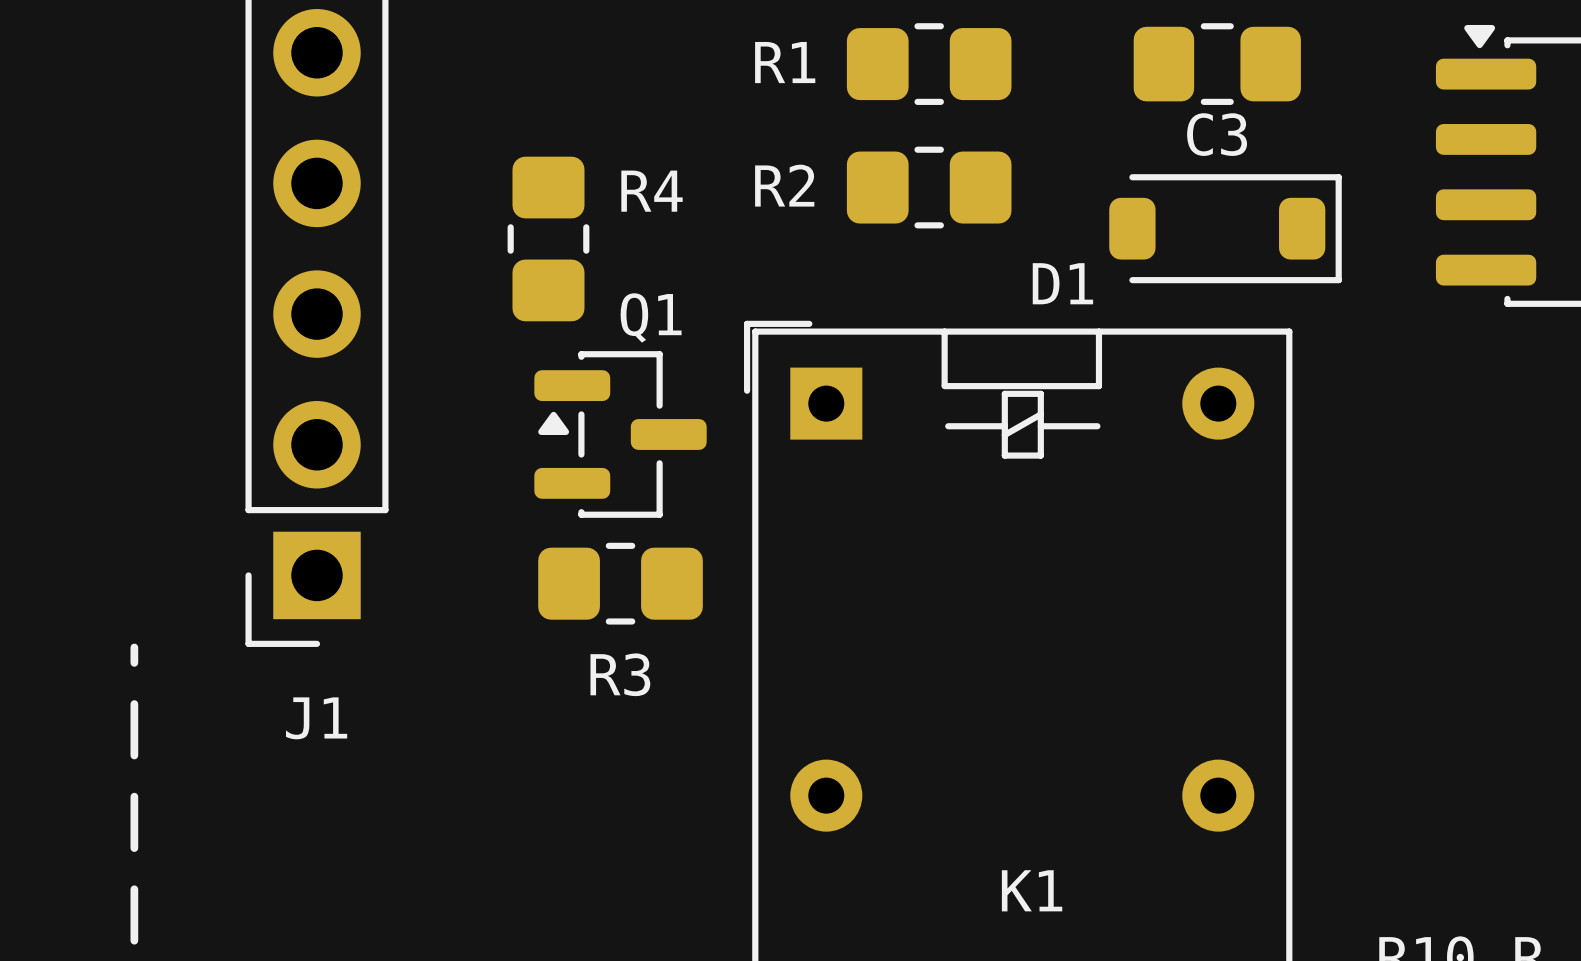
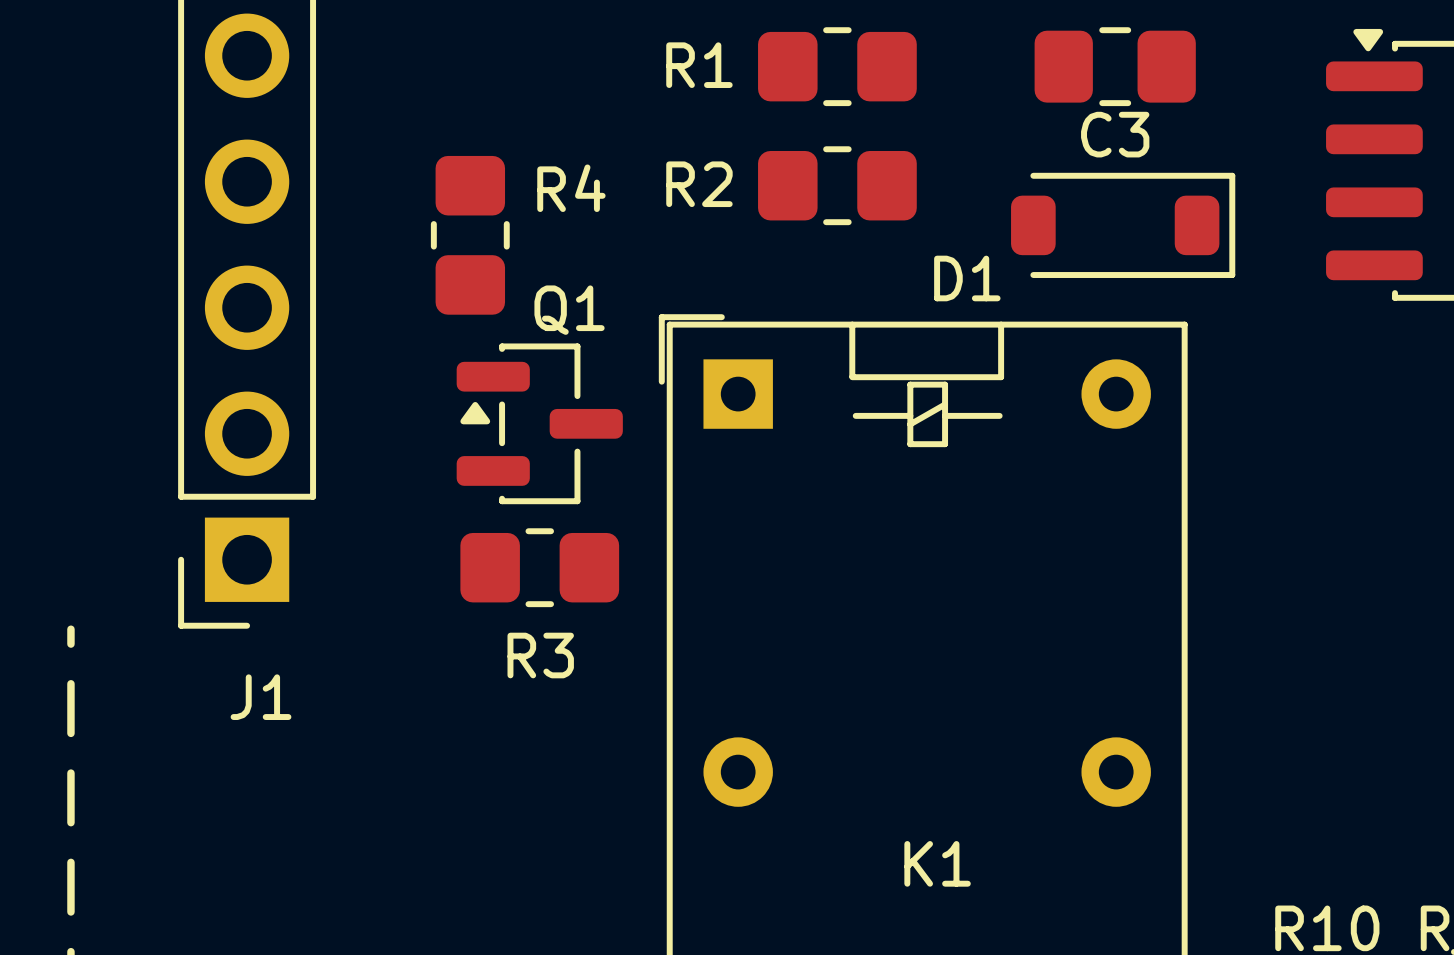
text position: J1 (316, 718) -> J1 (261, 697)

